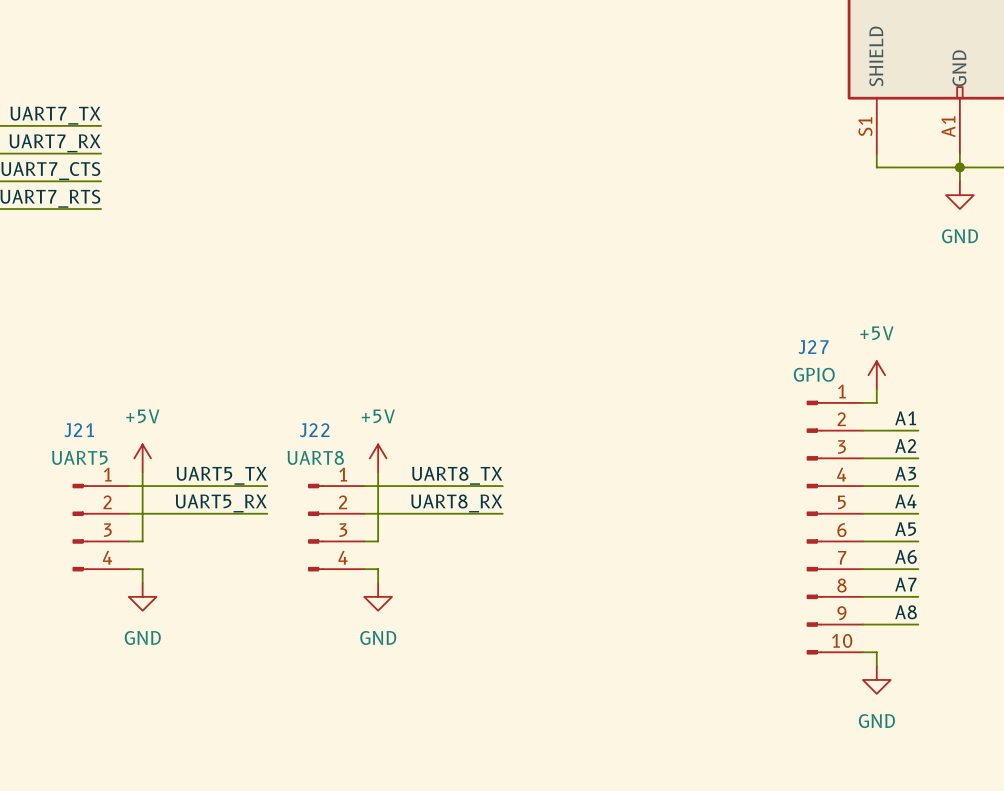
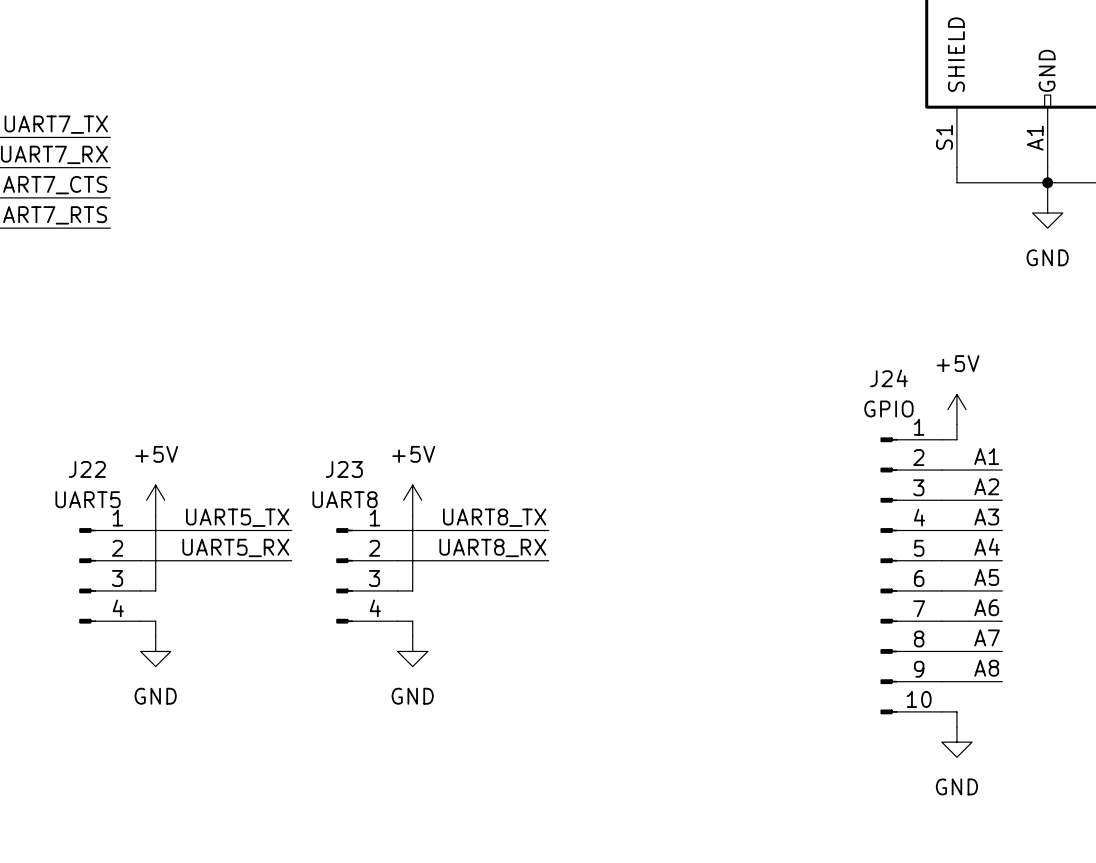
J27 name: J27 (813, 347) -> J24 (888, 378)
J21 name: J21 (79, 430) -> J22 (87, 469)
J22 name: J22 (314, 430) -> J23 (344, 469)

